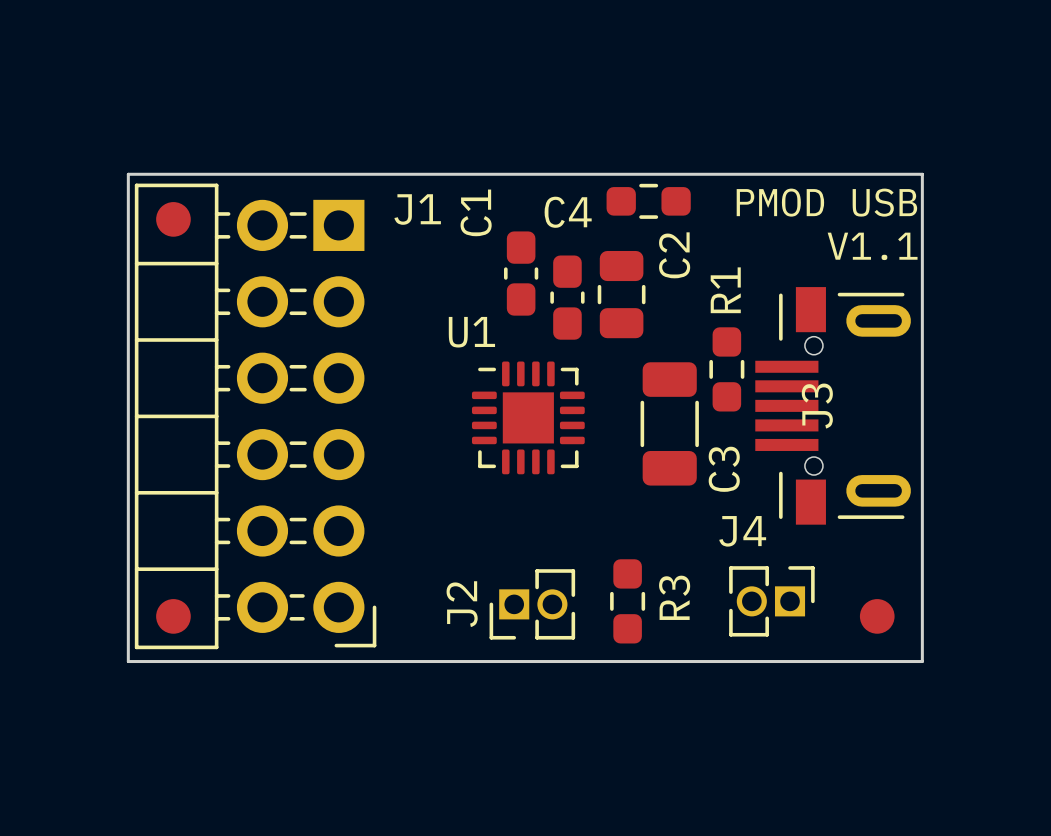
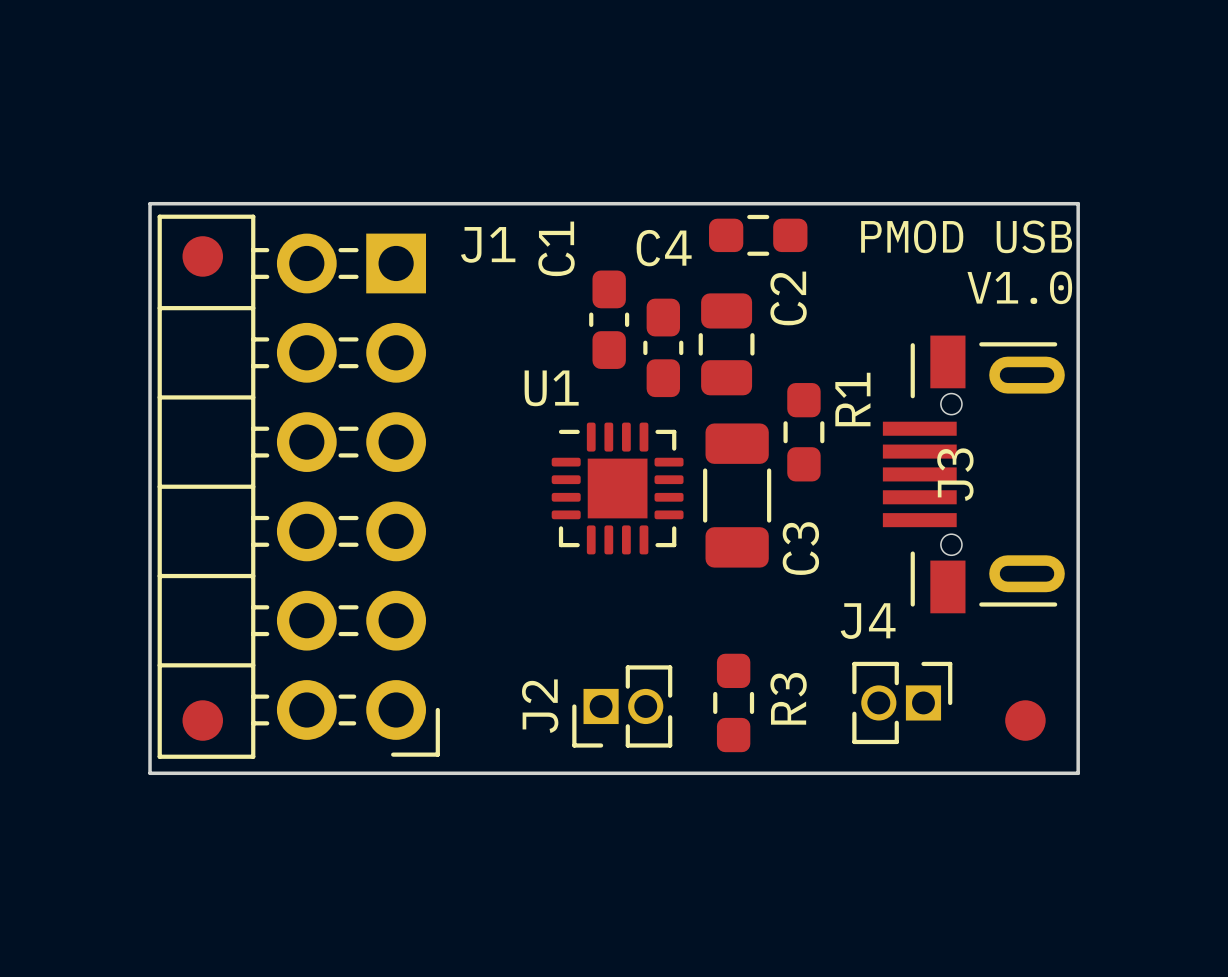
text: V1.1 (872, 246) -> V1.0 (1019, 287)
R1 name position: R1 (725, 290) -> R1 (852, 399)
R1 position: (726, 369) -> (803, 432)
C3 position: (669, 423) -> (737, 495)

